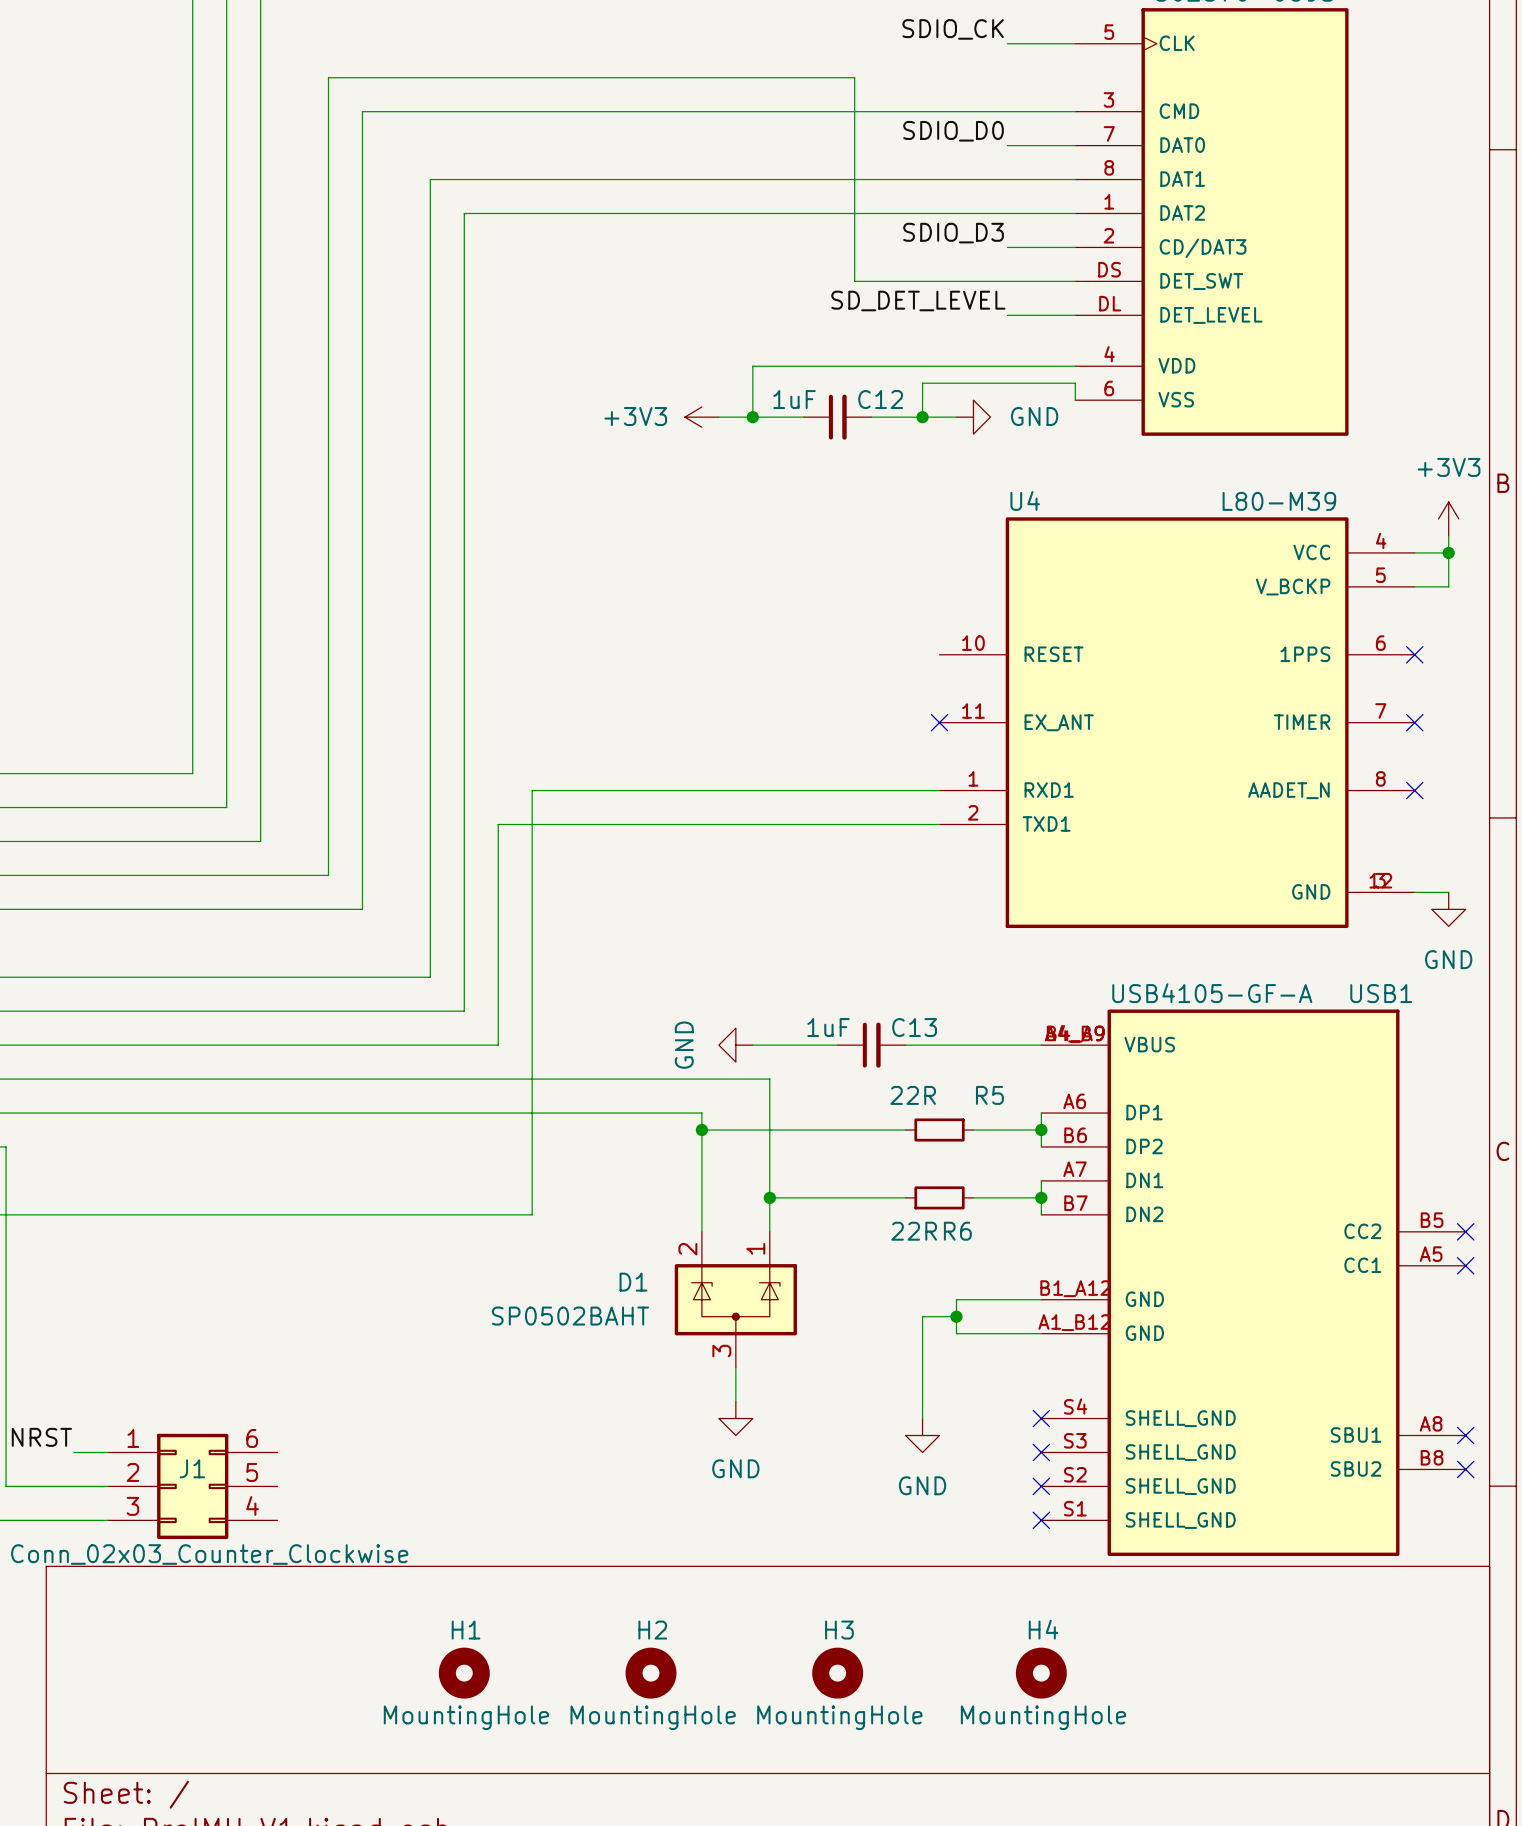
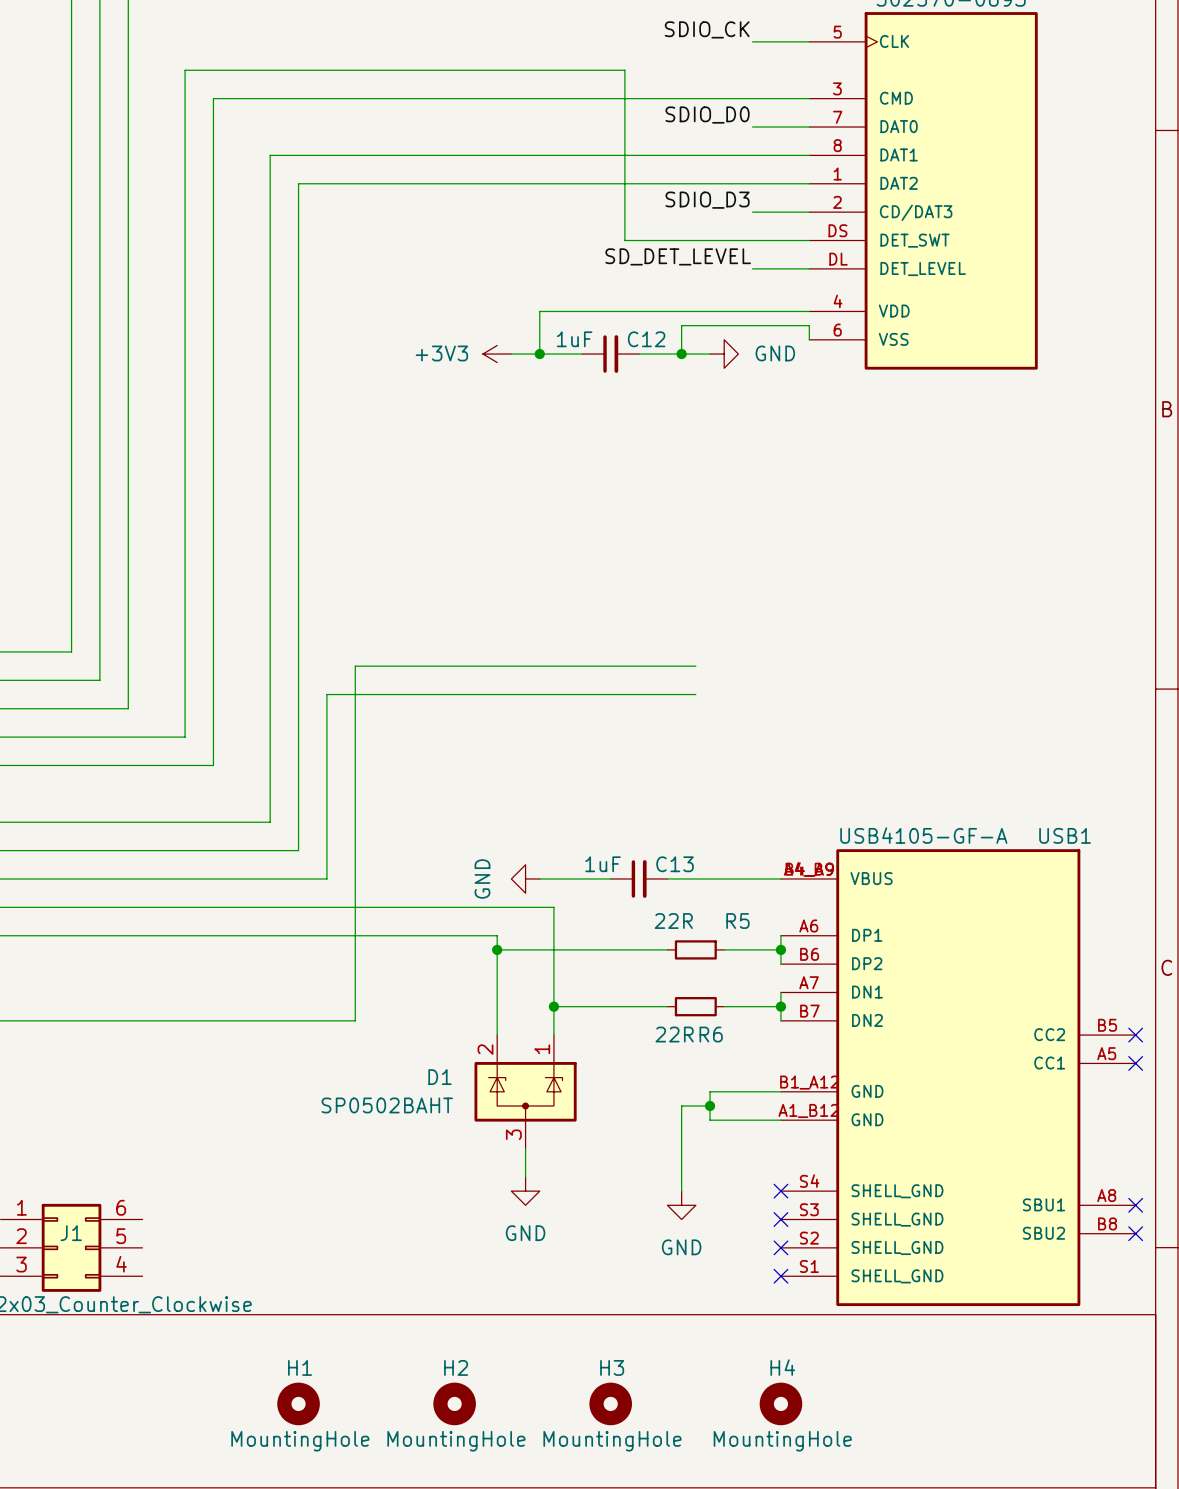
power symbol: +3V3 (1448, 518) -> none
wire: (1448, 535) (1448, 586) (1414, 586) -> none
wire: (1414, 552) (1448, 552) -> none
junction: (1448, 552) -> none
no-connect mark: (1414, 654) -> none
no-connect mark: (939, 722) -> none
U4: L80-M39 (1177, 722) -> none
no-connect mark: (1414, 722) -> none
no-connect mark: (1414, 790) -> none
wire: (1414, 892) (1448, 892) -> none
power symbol: GND (1448, 909) -> none

